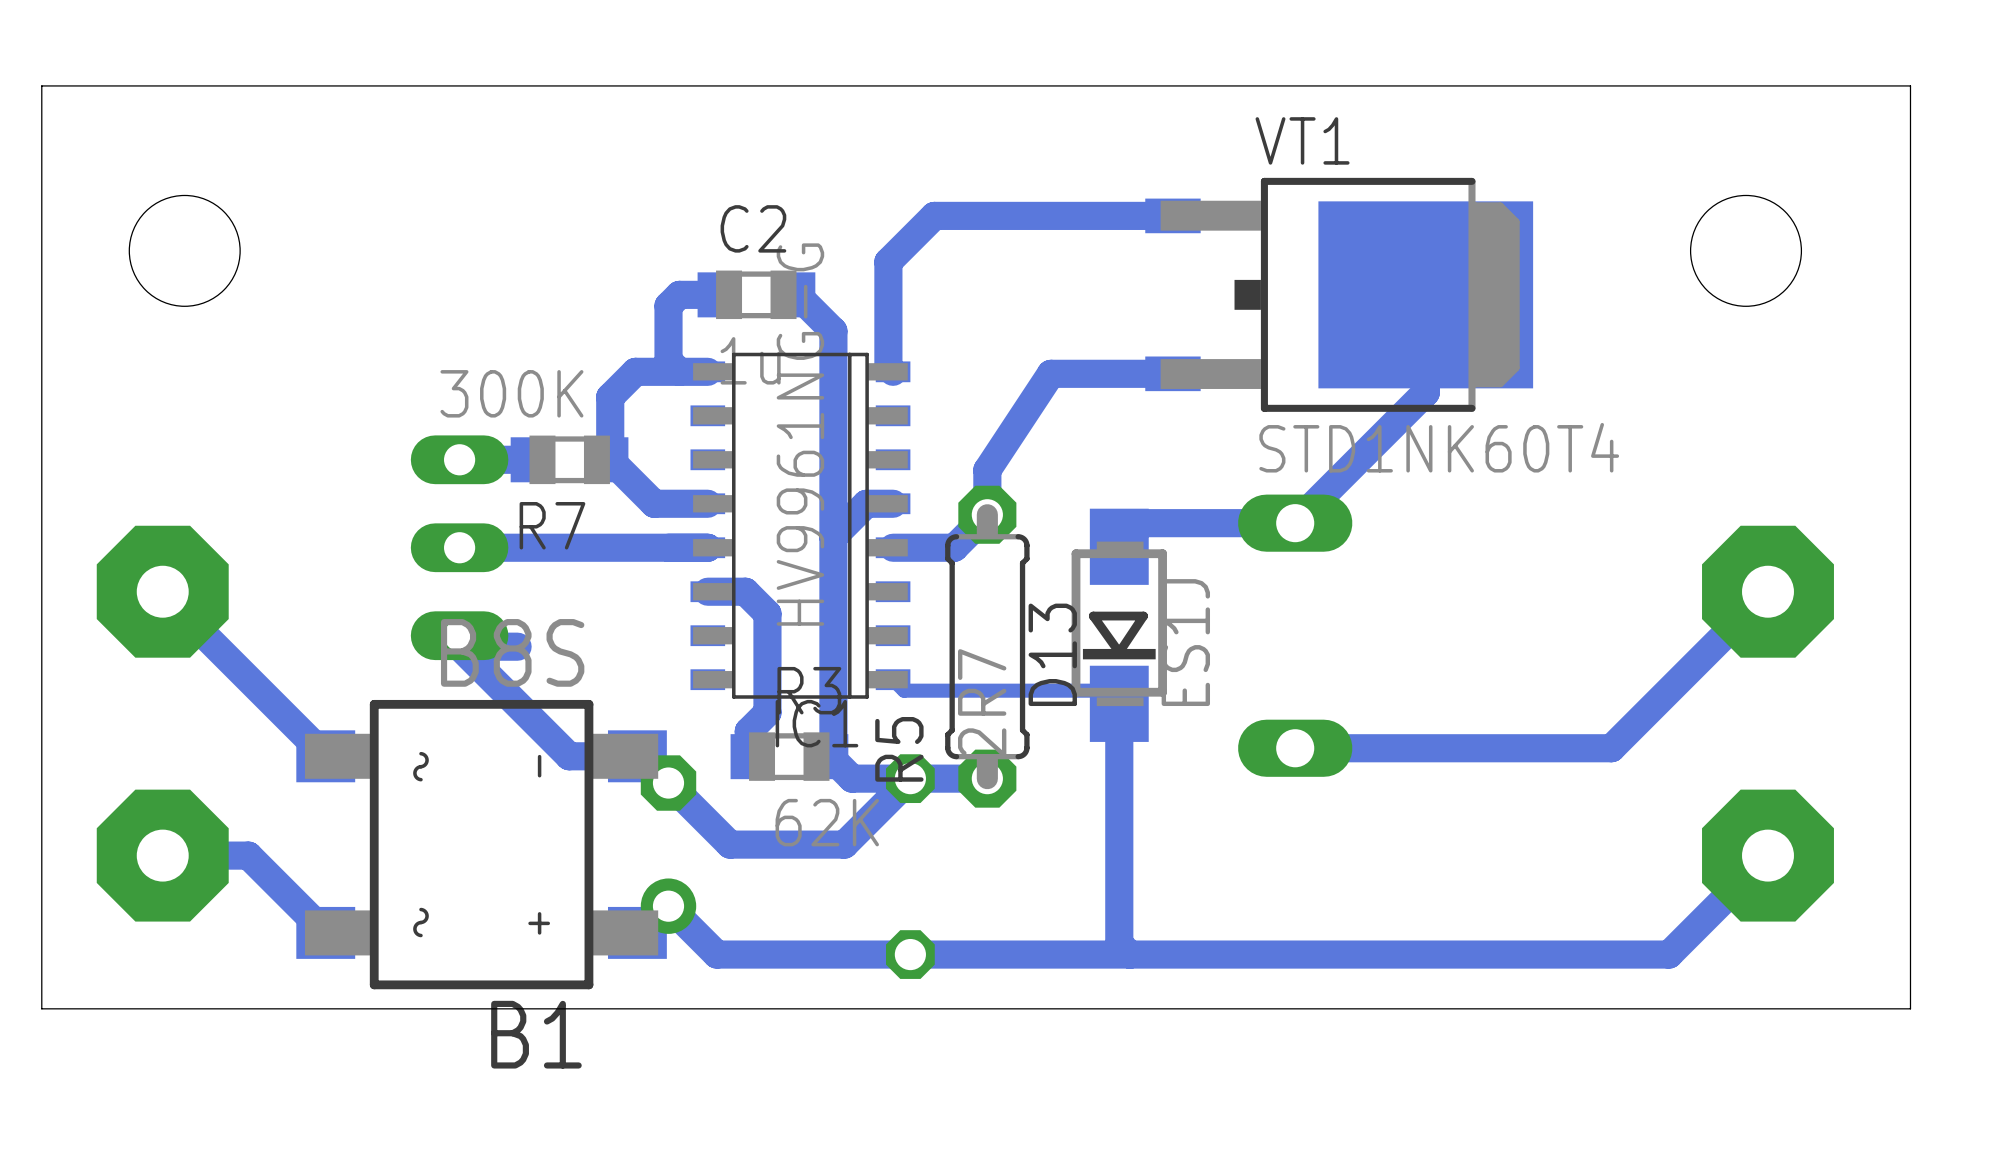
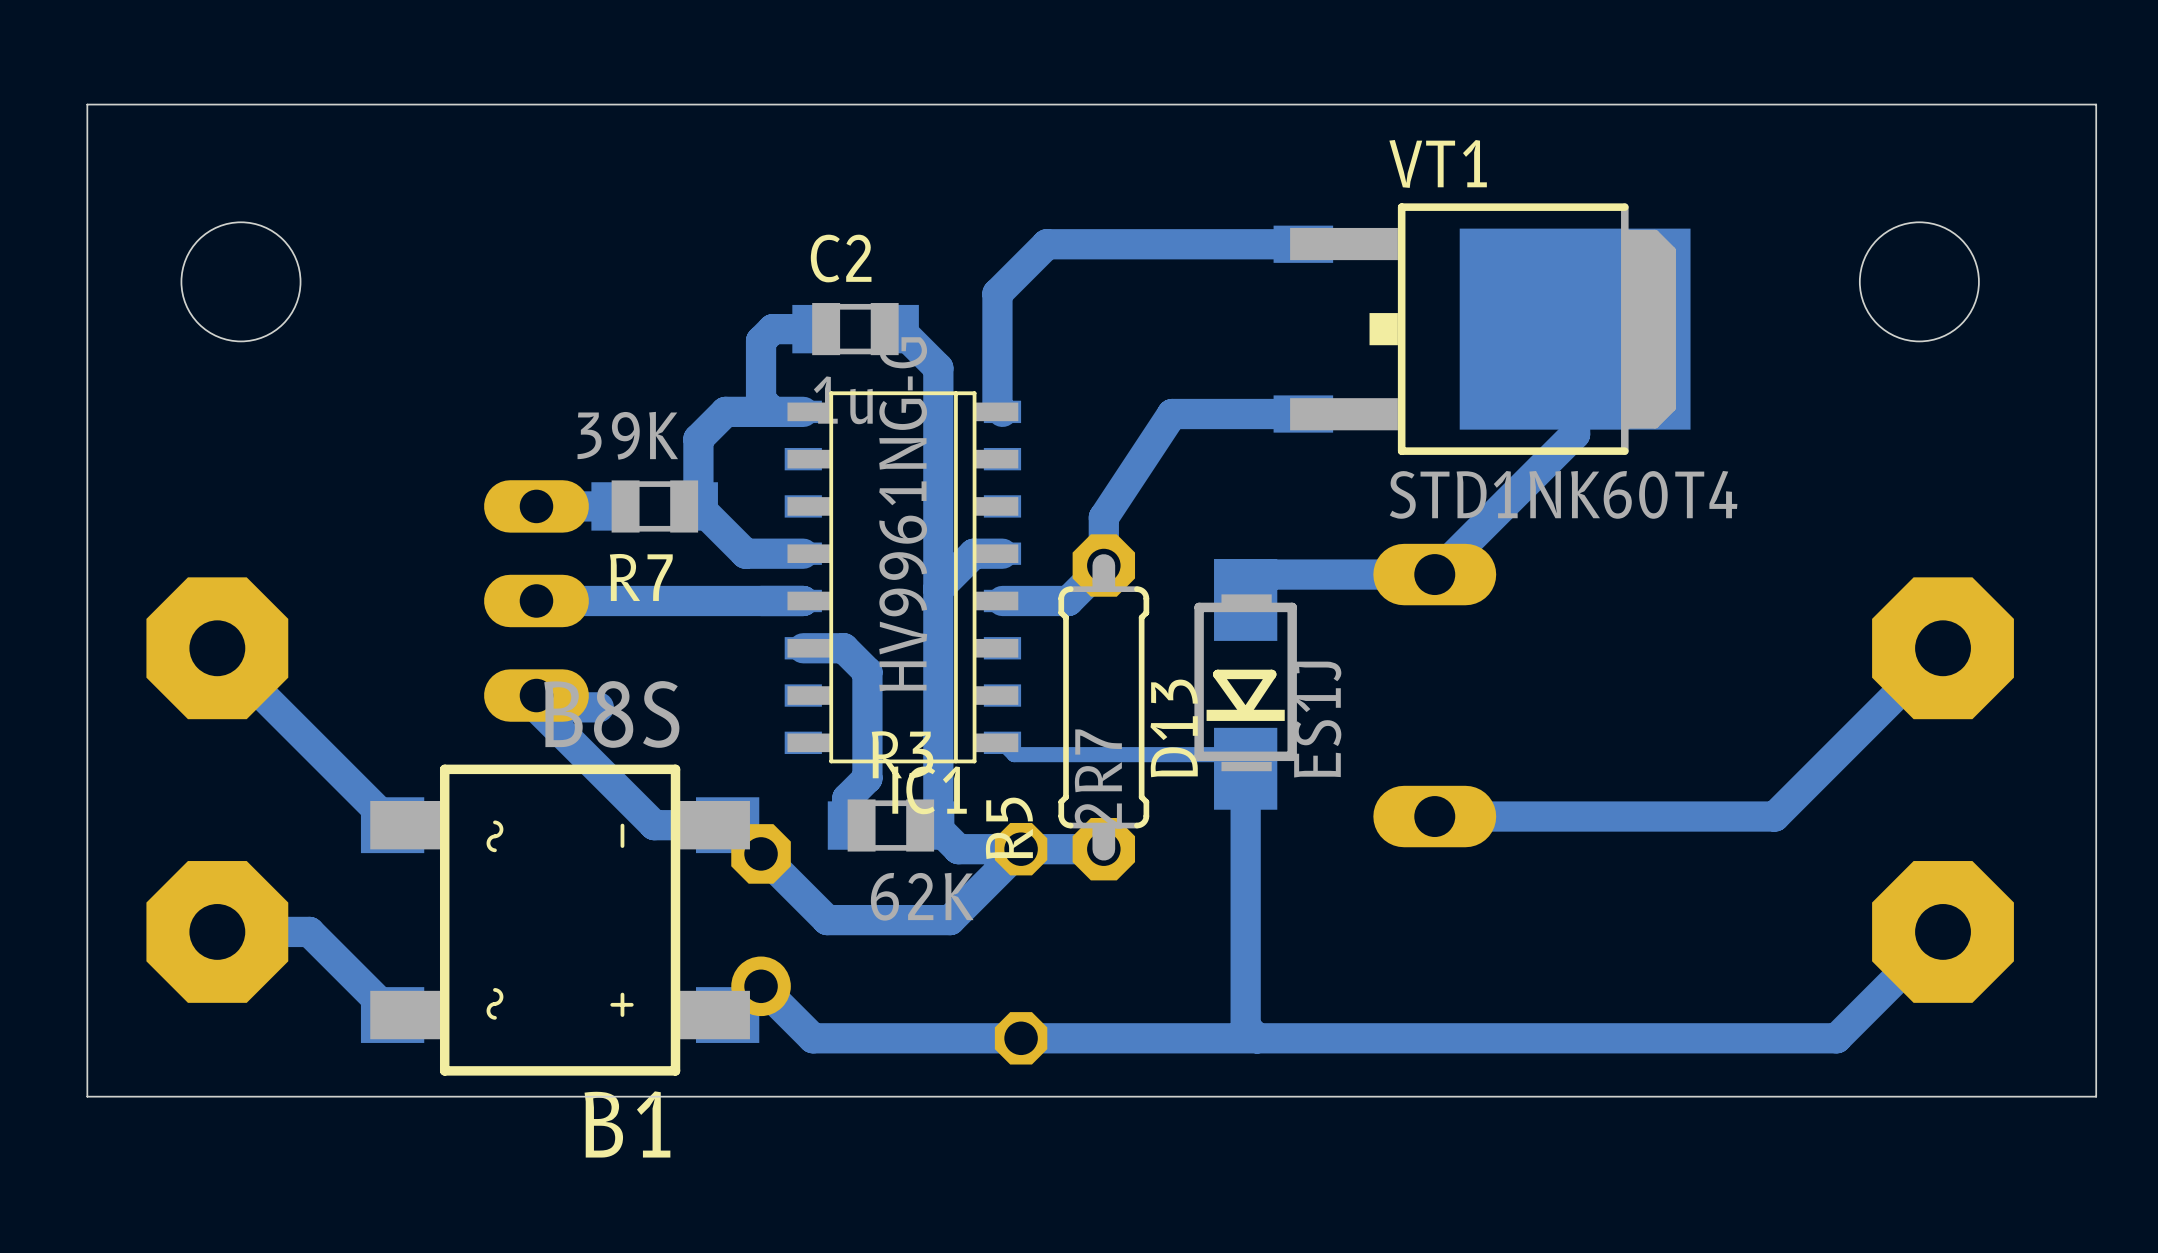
R7 value: 300K (511, 393) -> 39K (627, 435)

